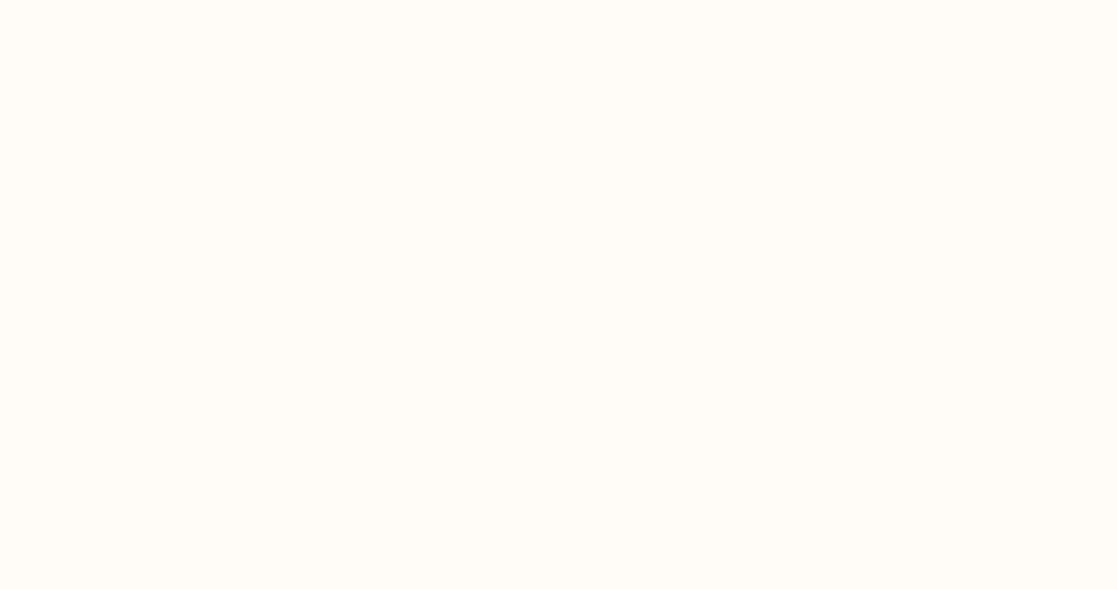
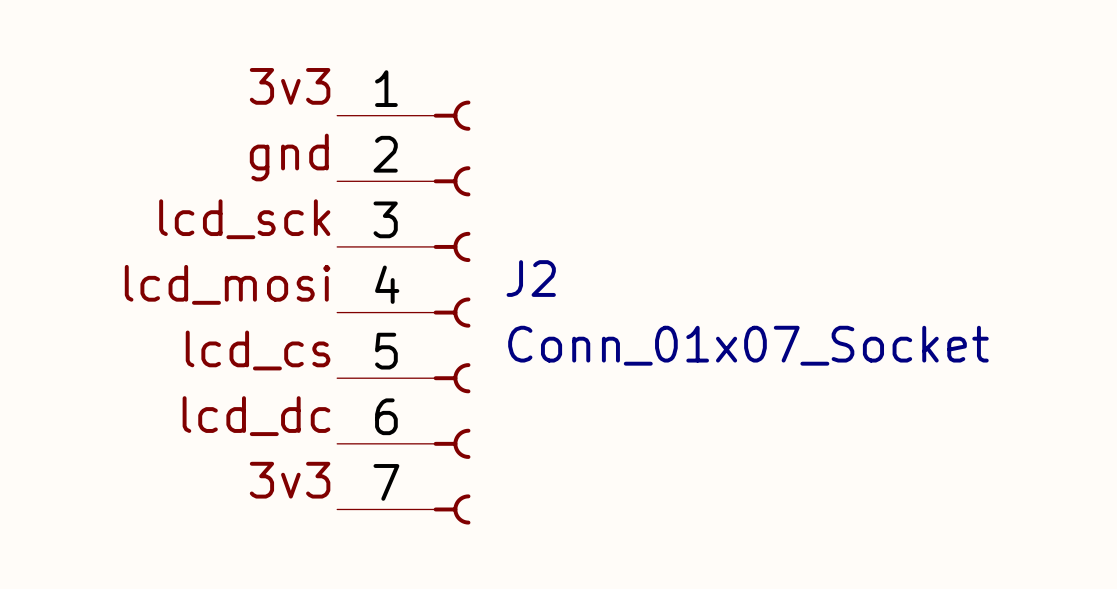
label: none -> 3v3 (290, 86)
label: none -> gnd (289, 157)
label: none -> lcd_sck (244, 219)
label: none -> lcd_mosi (227, 284)
J2: none -> Conn_01x07_Socket (403, 312)
label: none -> lcd_cs (258, 350)
label: none -> lcd_dc (256, 416)
label: none -> 3v3 (290, 480)

